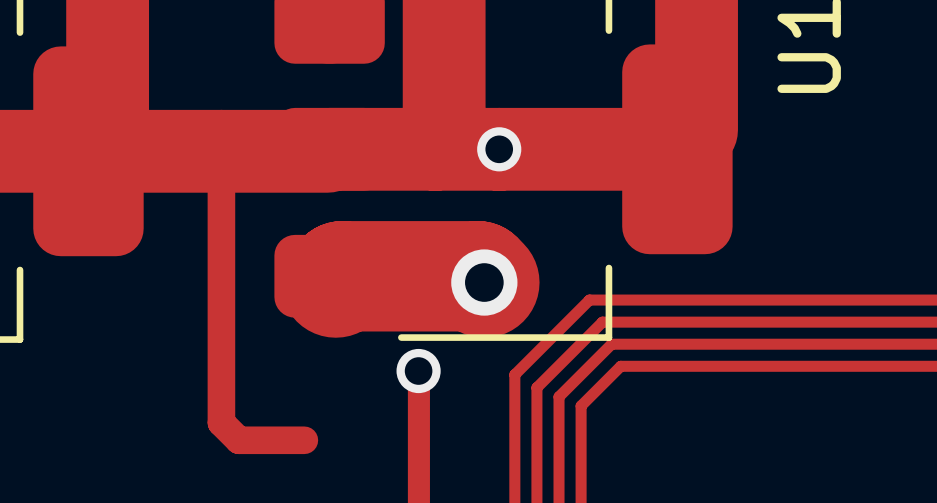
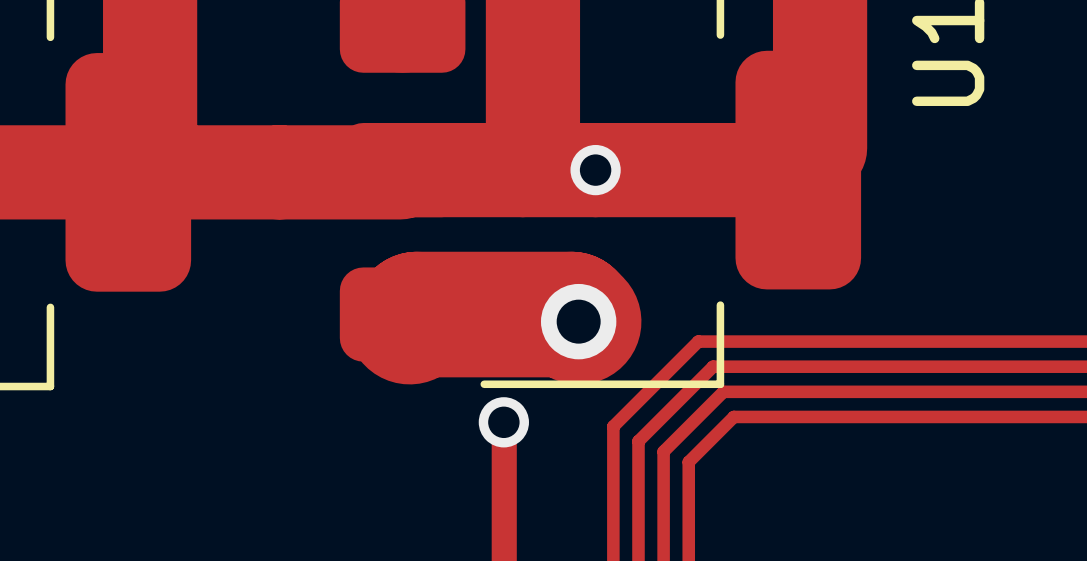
track: (221, 151) (221, 422) (238, 440) (304, 440) -> none

